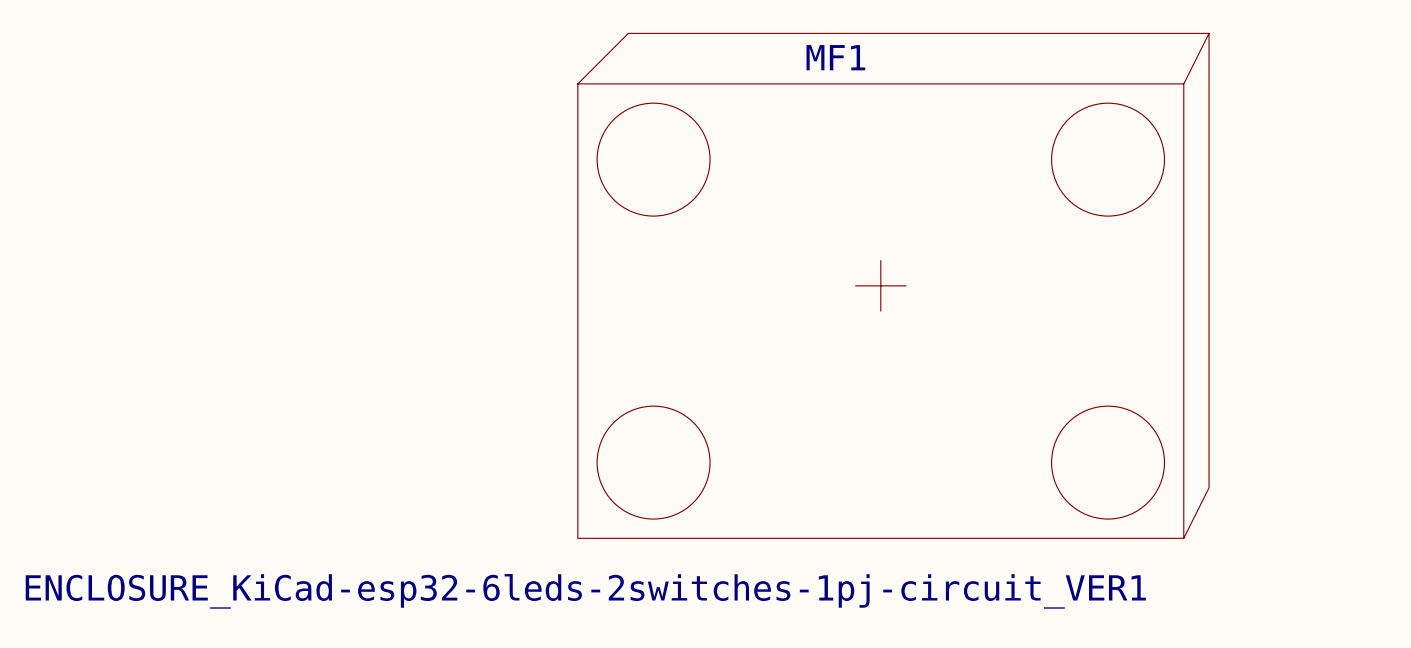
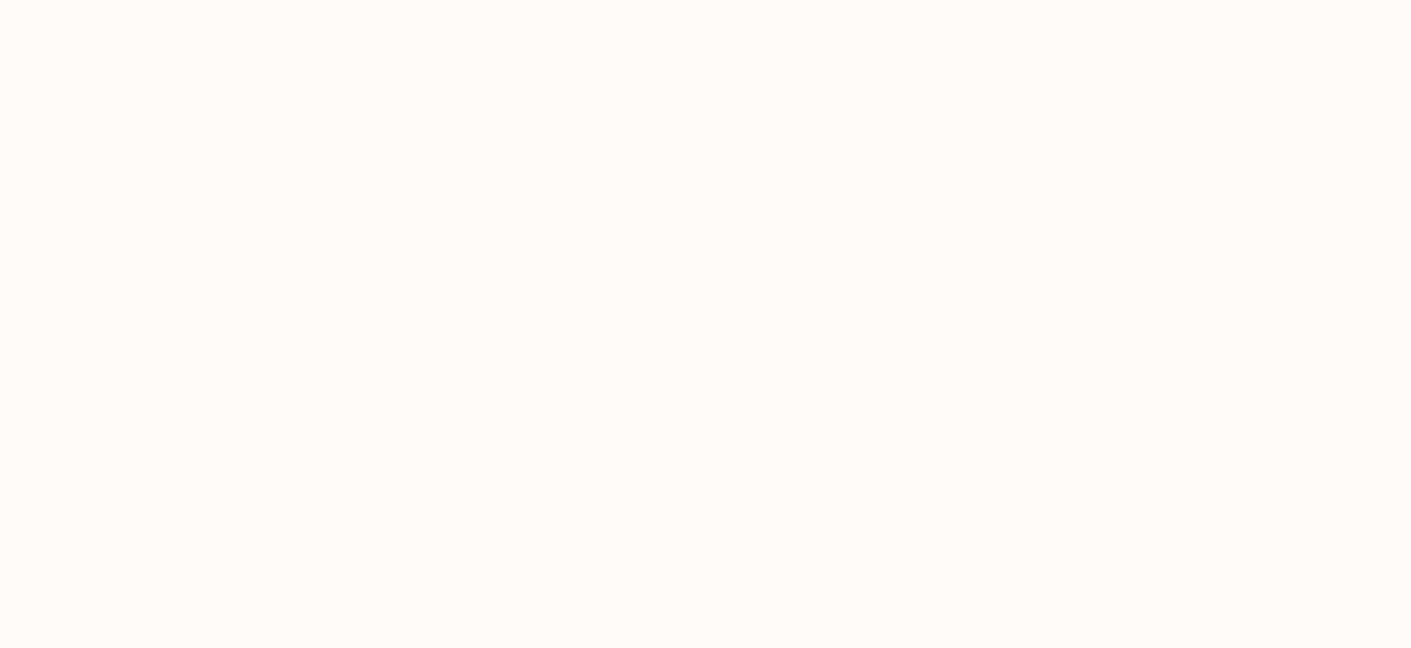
MF1: ENCLOSURE_KiCad-esp32-6leds-2switches-1pj-circuit_VER1 (893, 285) -> none

